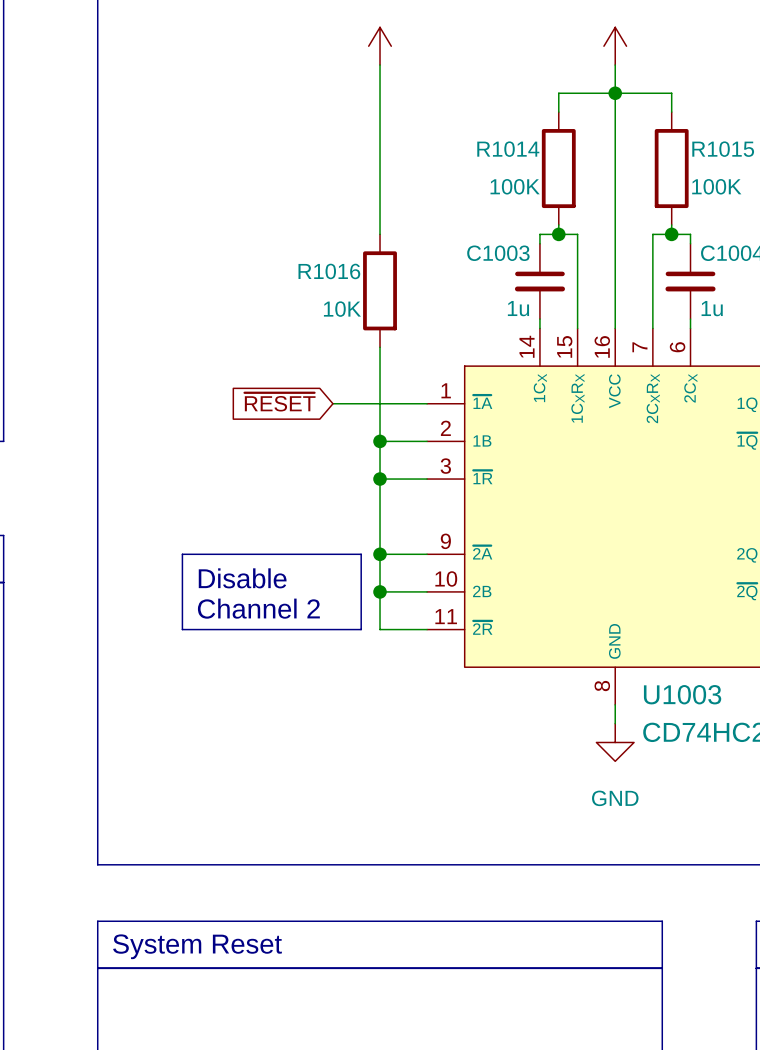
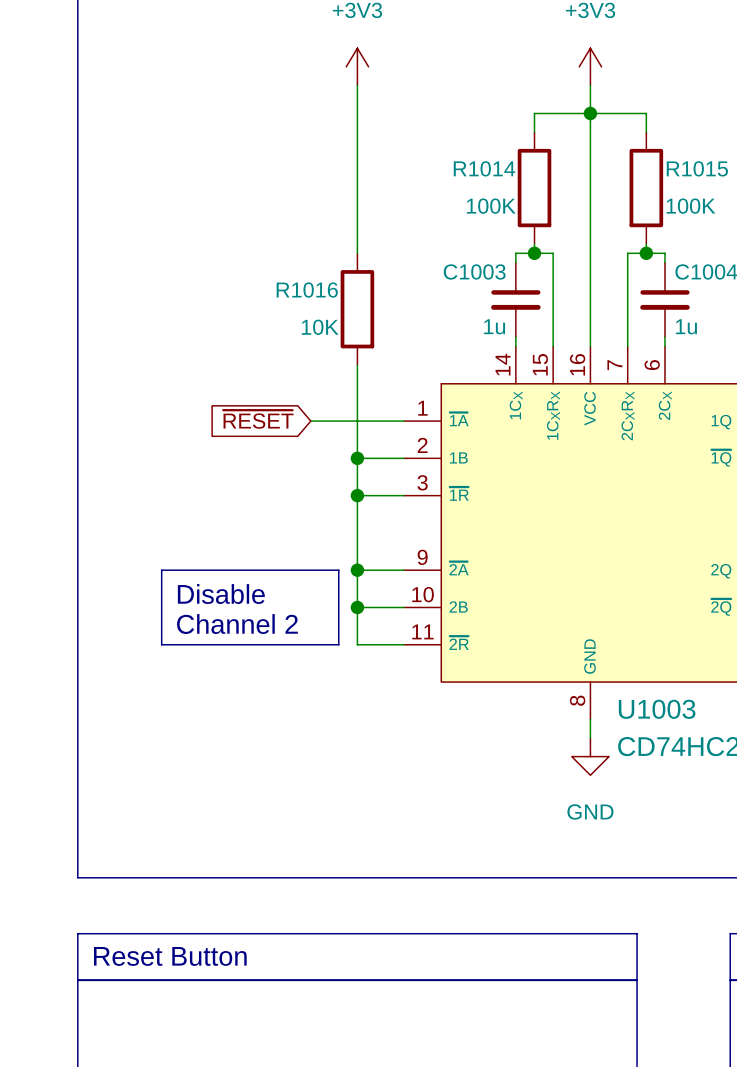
text: System Reset (197, 946) -> Reset Button (170, 956)

